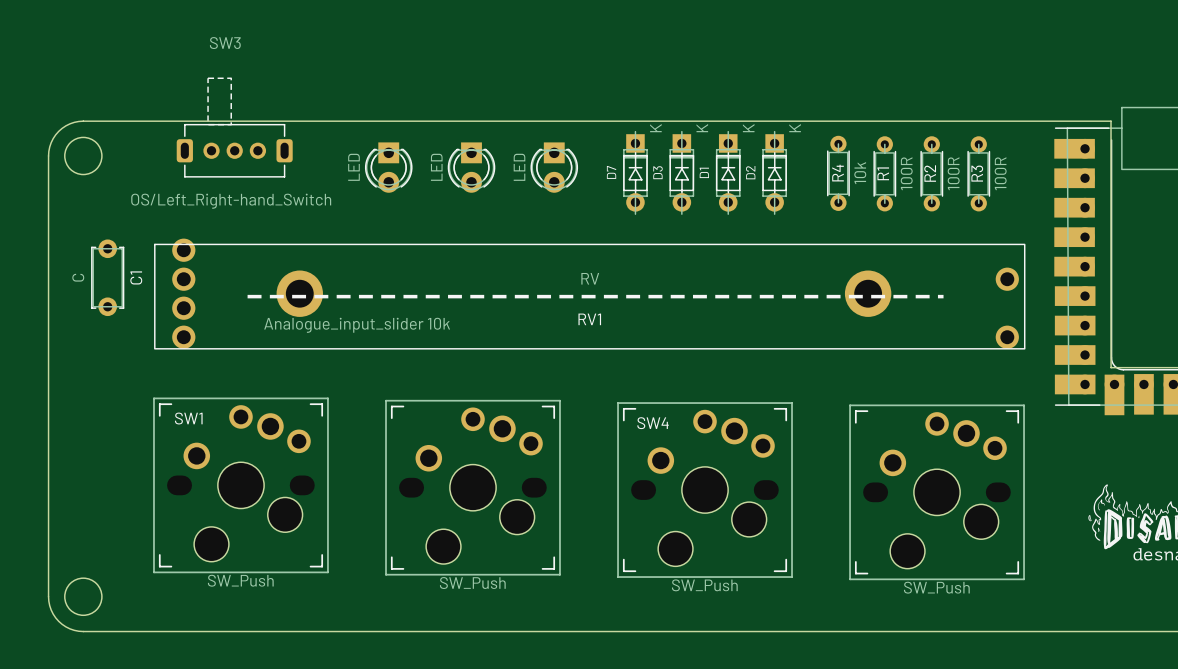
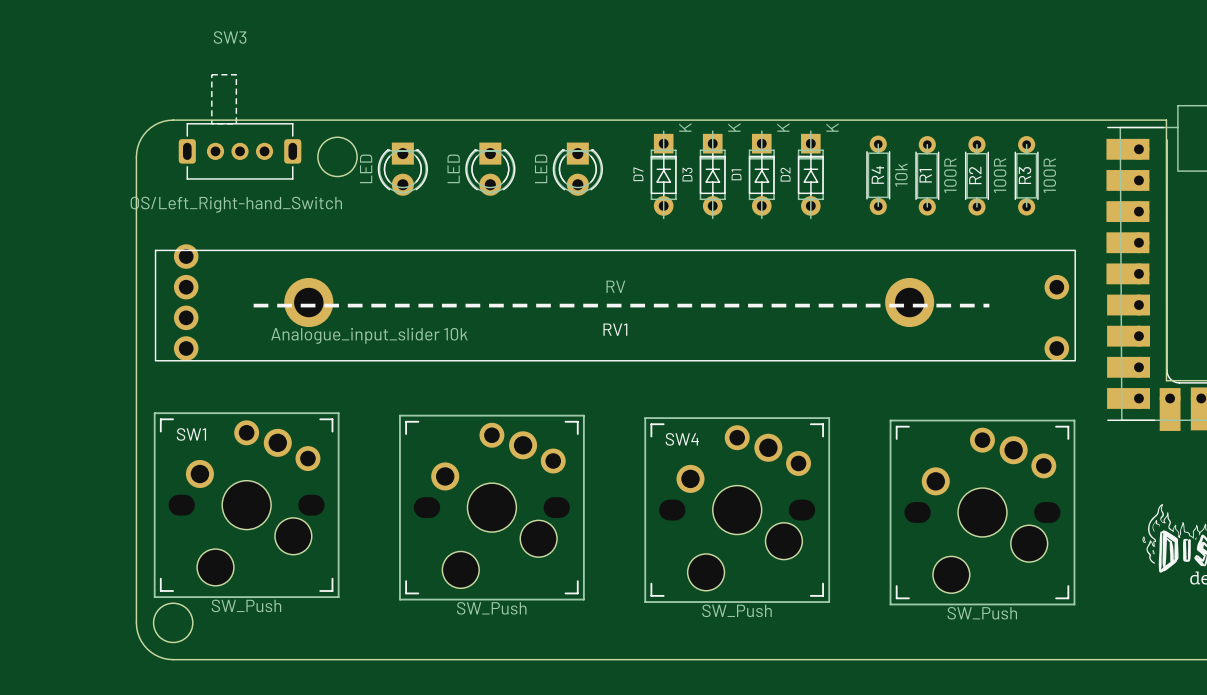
board edge: (171, 121) (74, 122) (65, 125) (55, 134) (49, 146) (48, 155) (49, 605) (58, 621) (74, 630) (171, 631) -> (173, 120) (159, 122) (147, 130) (139, 142) (136, 156) (136, 627) (141, 641) (150, 652) (163, 658) (173, 659)
round board edge: [64, 137, 103, 175] -> none
round board edge: none -> [317, 137, 358, 177]
C1: C (107, 277) -> none
round board edge position: (83, 596) -> (173, 622)

